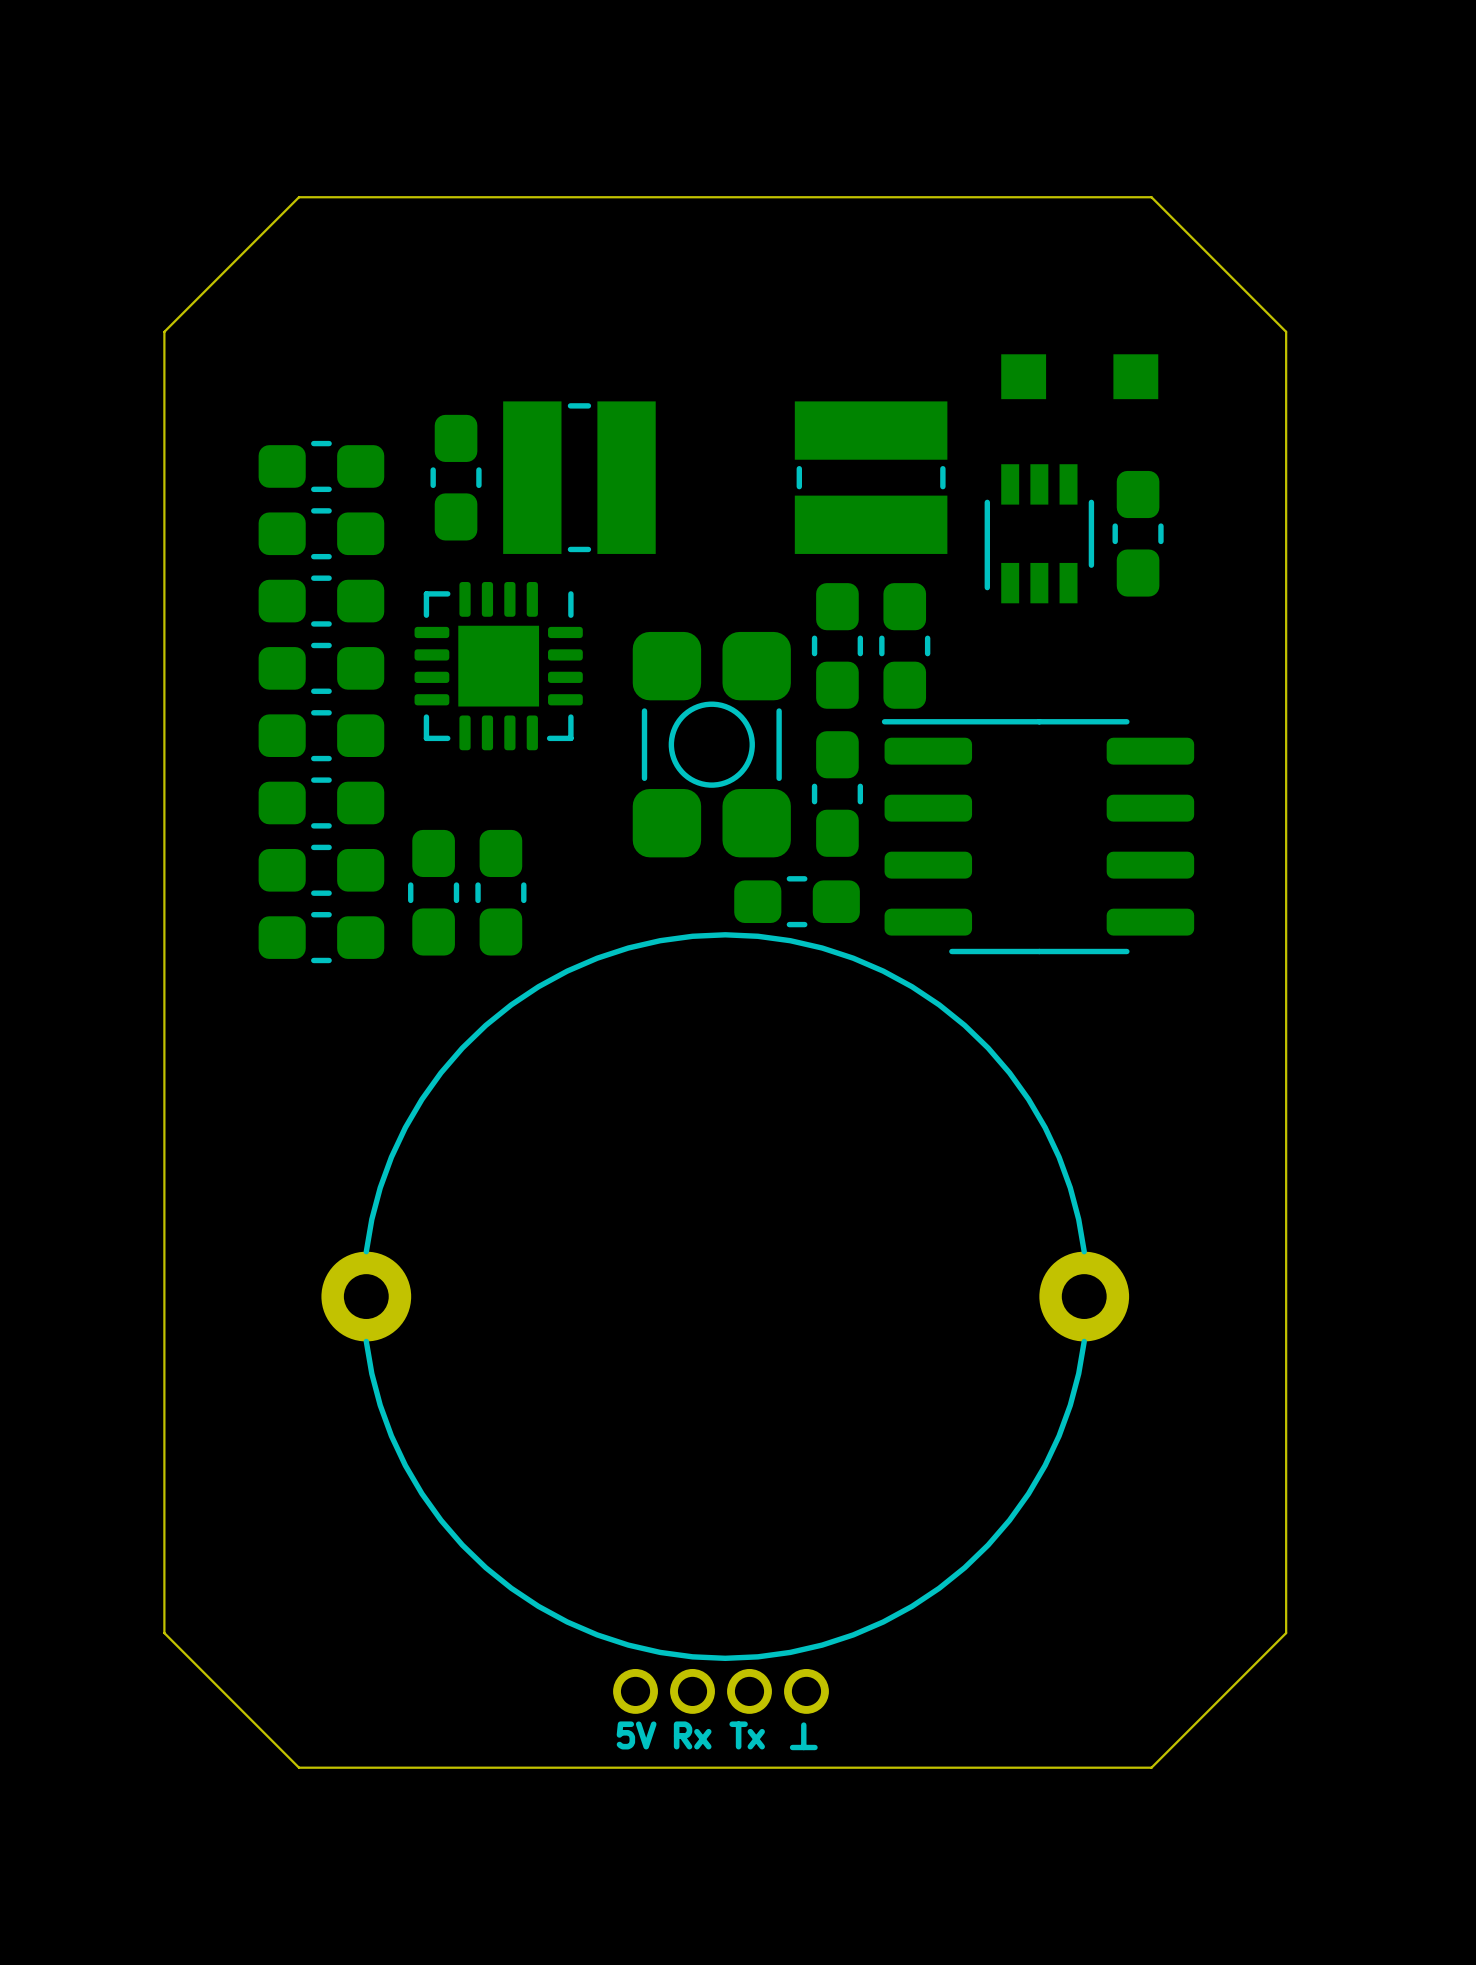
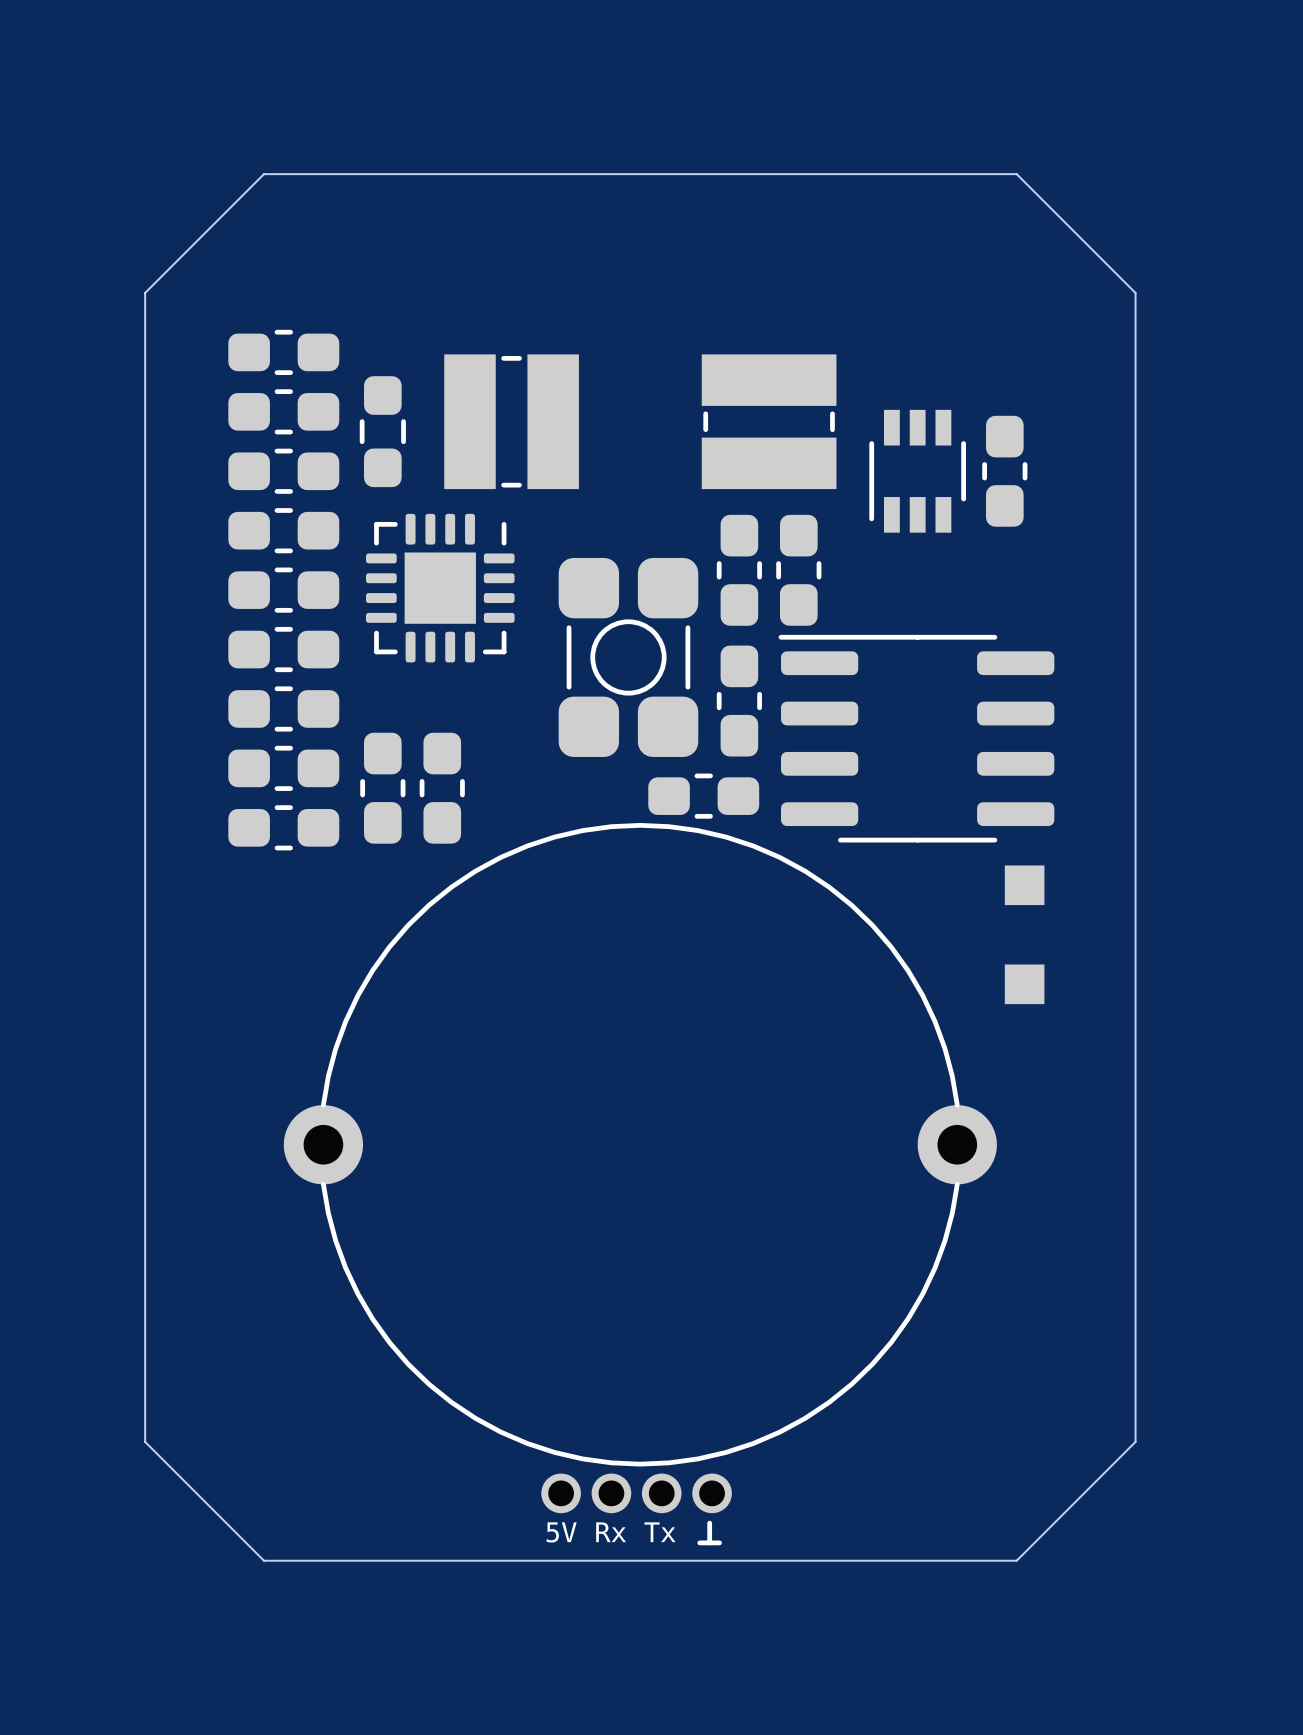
part rotation: 0° (1079, 376) -> 90° clockwise (1024, 934)
part position: (1079, 376) -> (1024, 934)
part: none -> (283, 352)
part footprint: [430, 414, 482, 541] -> [359, 376, 406, 488]

